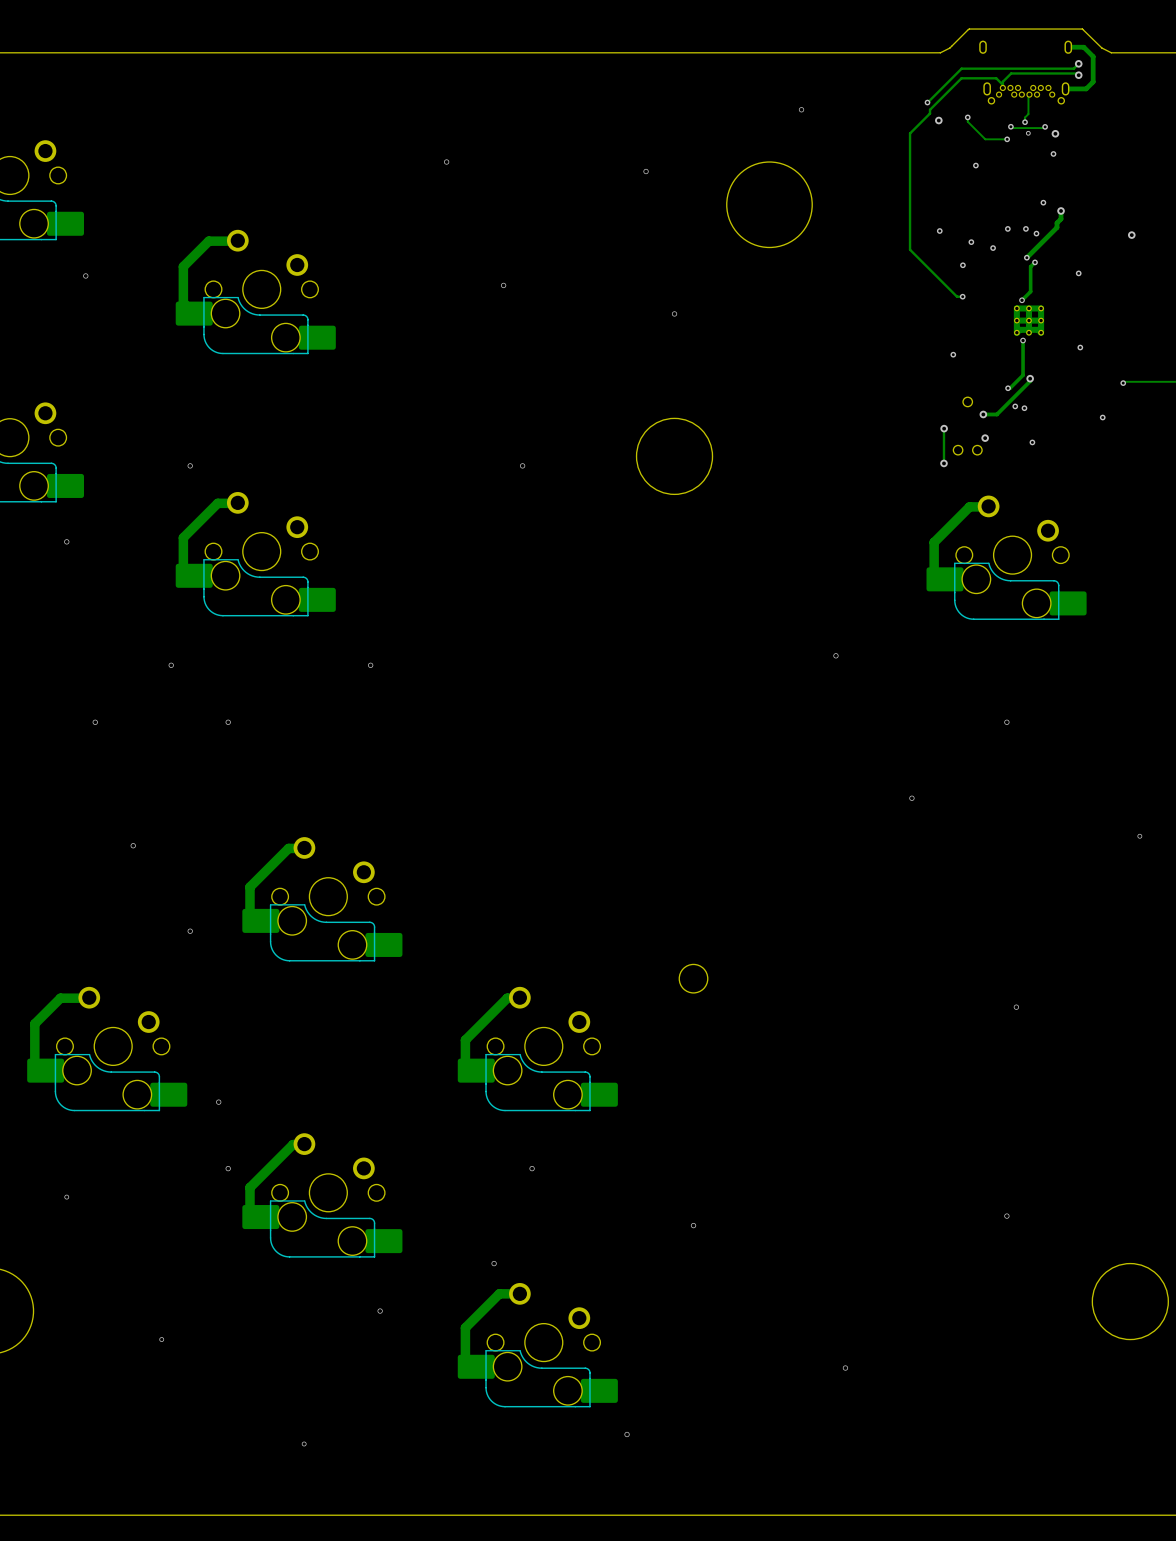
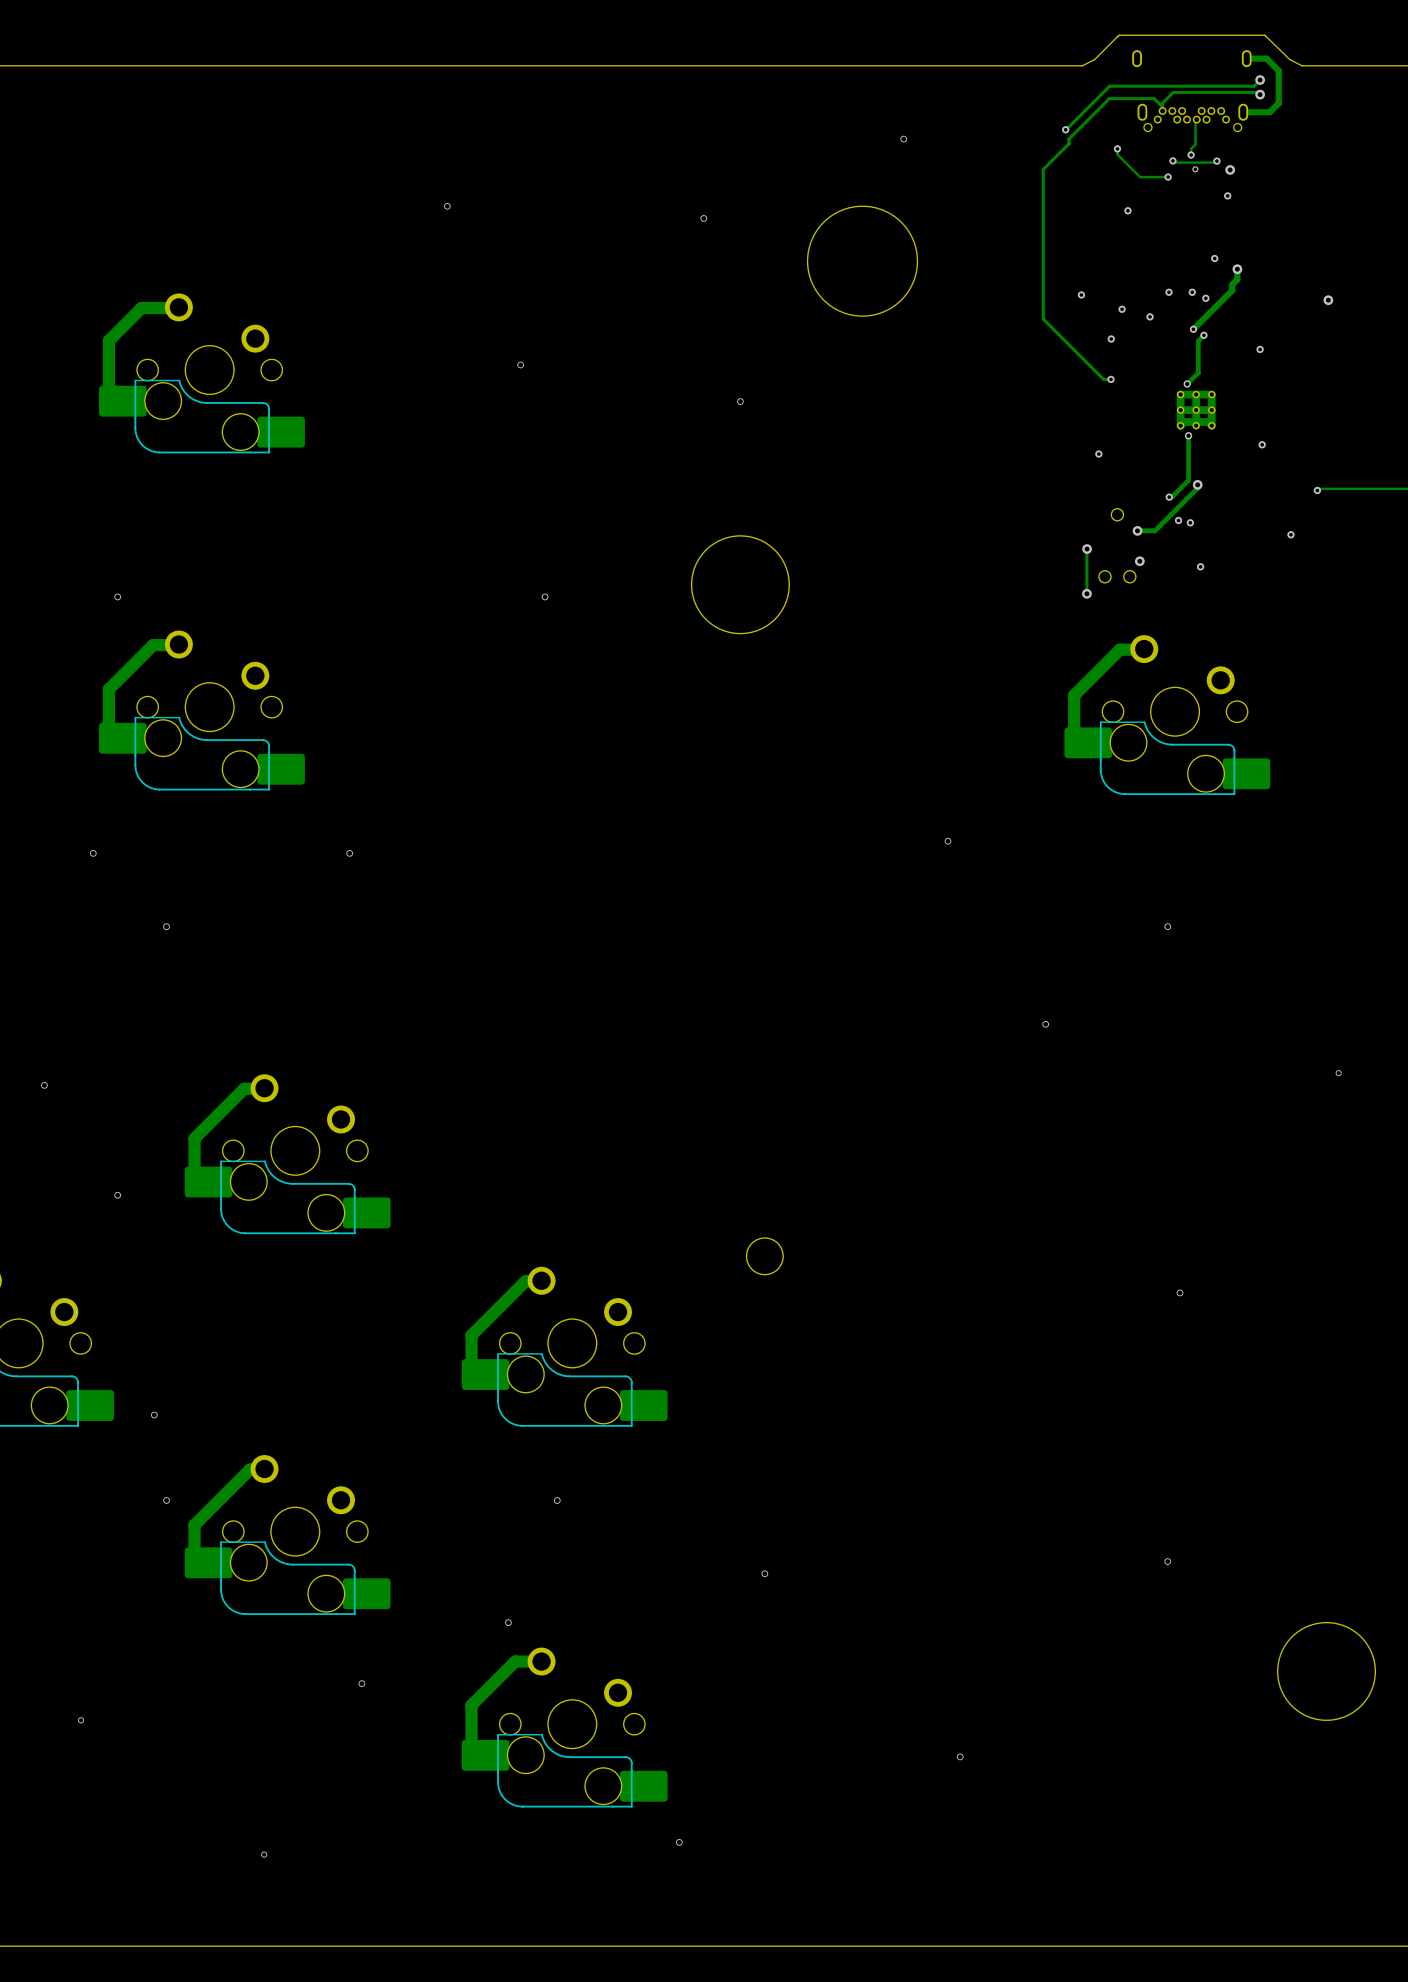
via: (938, 120) -> none

